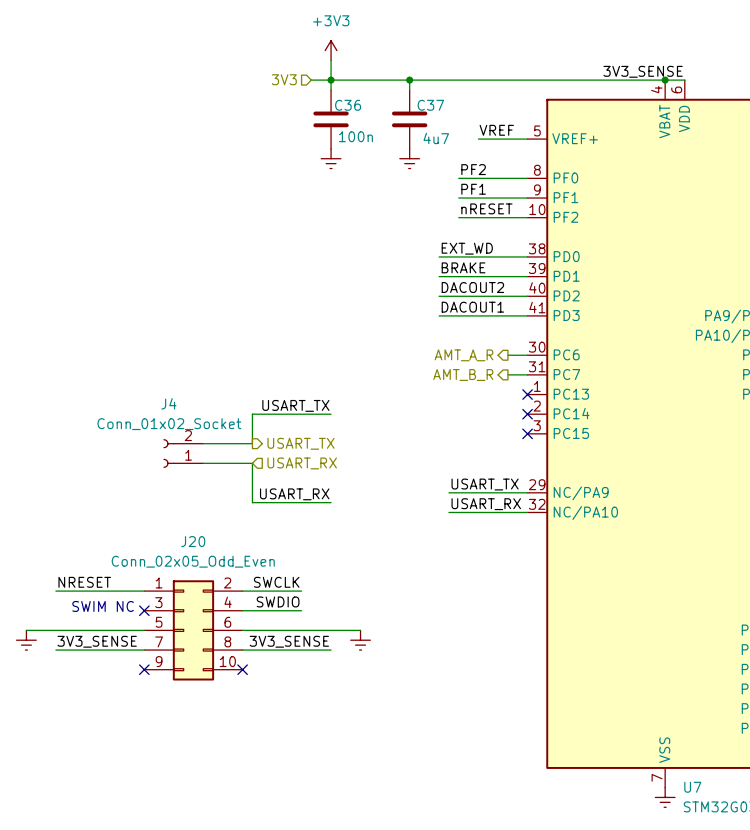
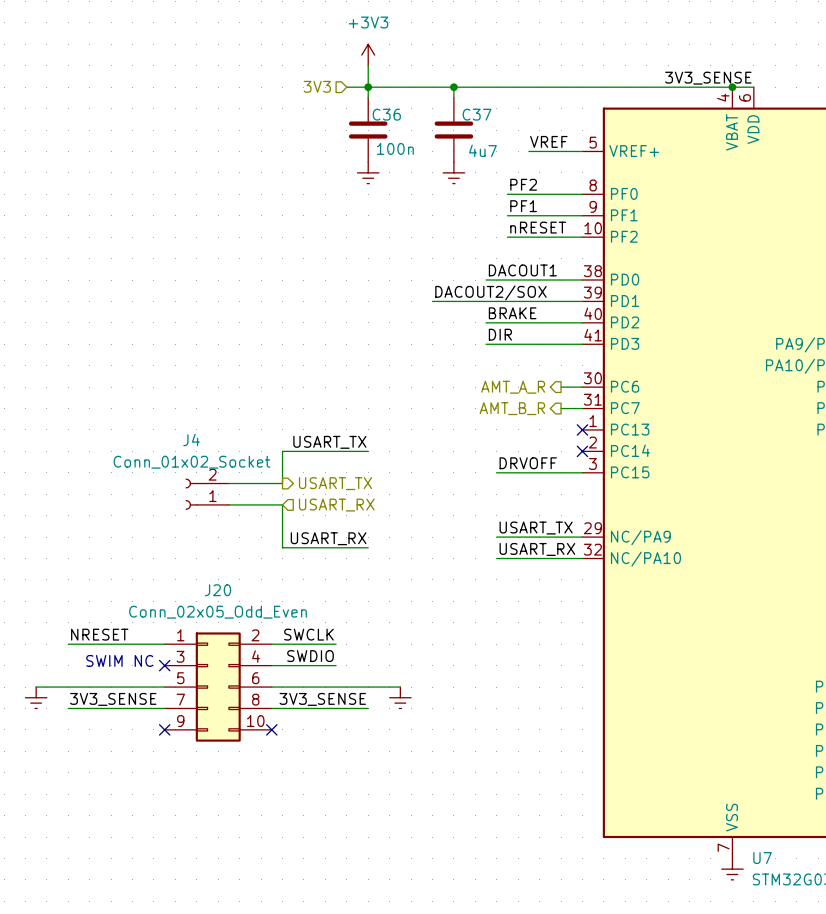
label: EXT_WD (467, 248) -> DACOUT1 (522, 270)
label: BRAKE (463, 267) -> none
label: none -> DACOUT2/SOX (490, 292)
wire: none -> (432, 301) (486, 301)
label: DACOUT2 (472, 287) -> BRAKE (512, 313)
label: DACOUT1 (472, 307) -> DIR (500, 334)
label: none -> DRVOFF (528, 463)
wire: none -> (496, 472) (582, 472)
no-connect mark: (527, 433) -> none

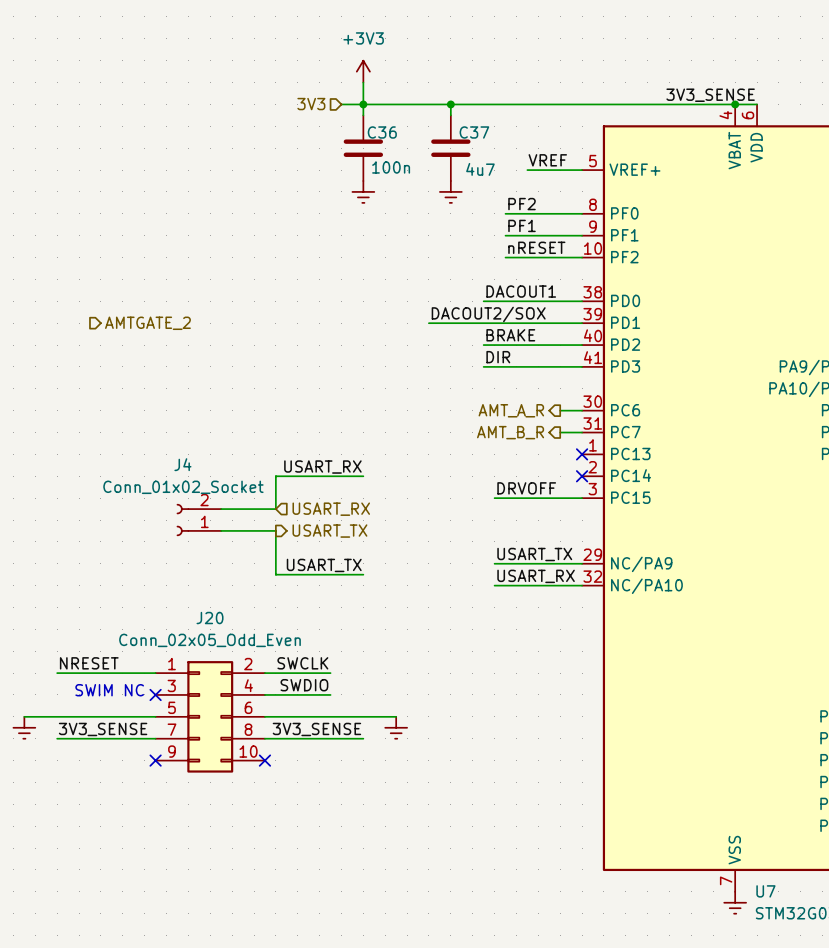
hierarchical label: none -> AMTGATE_2 (147, 323)
label: USART_TX (329, 442) -> USART_RX (322, 467)
hierarchical label shape: output (335, 483) -> input (331, 509)
hierarchical label: USART_TX (335, 483) -> USART_RX (331, 509)
hierarchical label shape: input (336, 505) -> output (329, 531)
hierarchical label: USART_RX (336, 505) -> USART_TX (329, 531)
label: USART_RX (328, 538) -> USART_TX (324, 565)

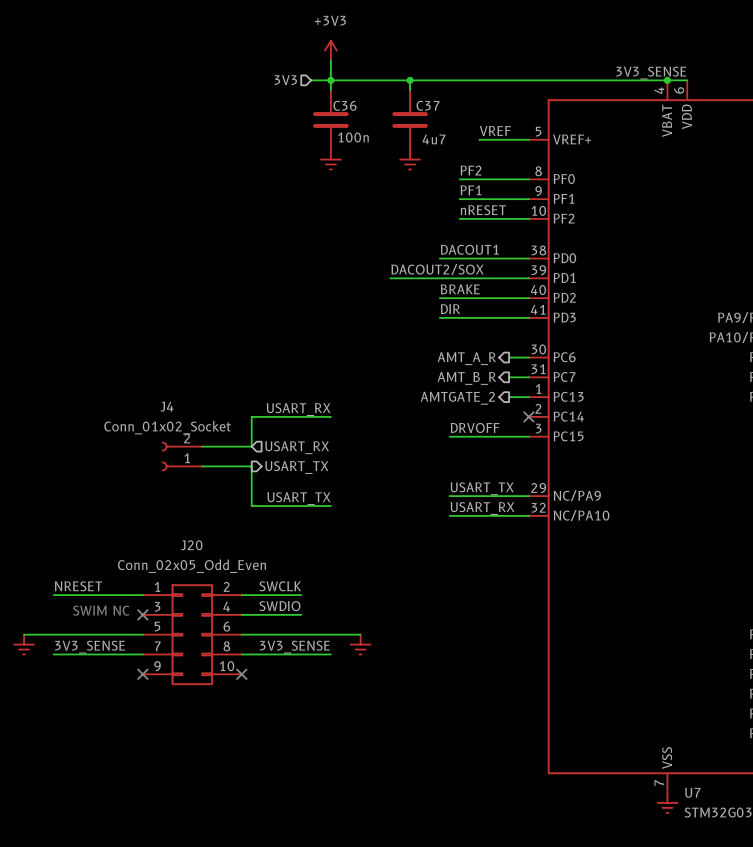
hierarchical label: AMTGATE_2 (147, 323) -> none
hierarchical label: none -> AMTGATE_2 (457, 398)
wire: none -> (509, 397) (528, 397)
no-connect mark: (582, 454) -> none

